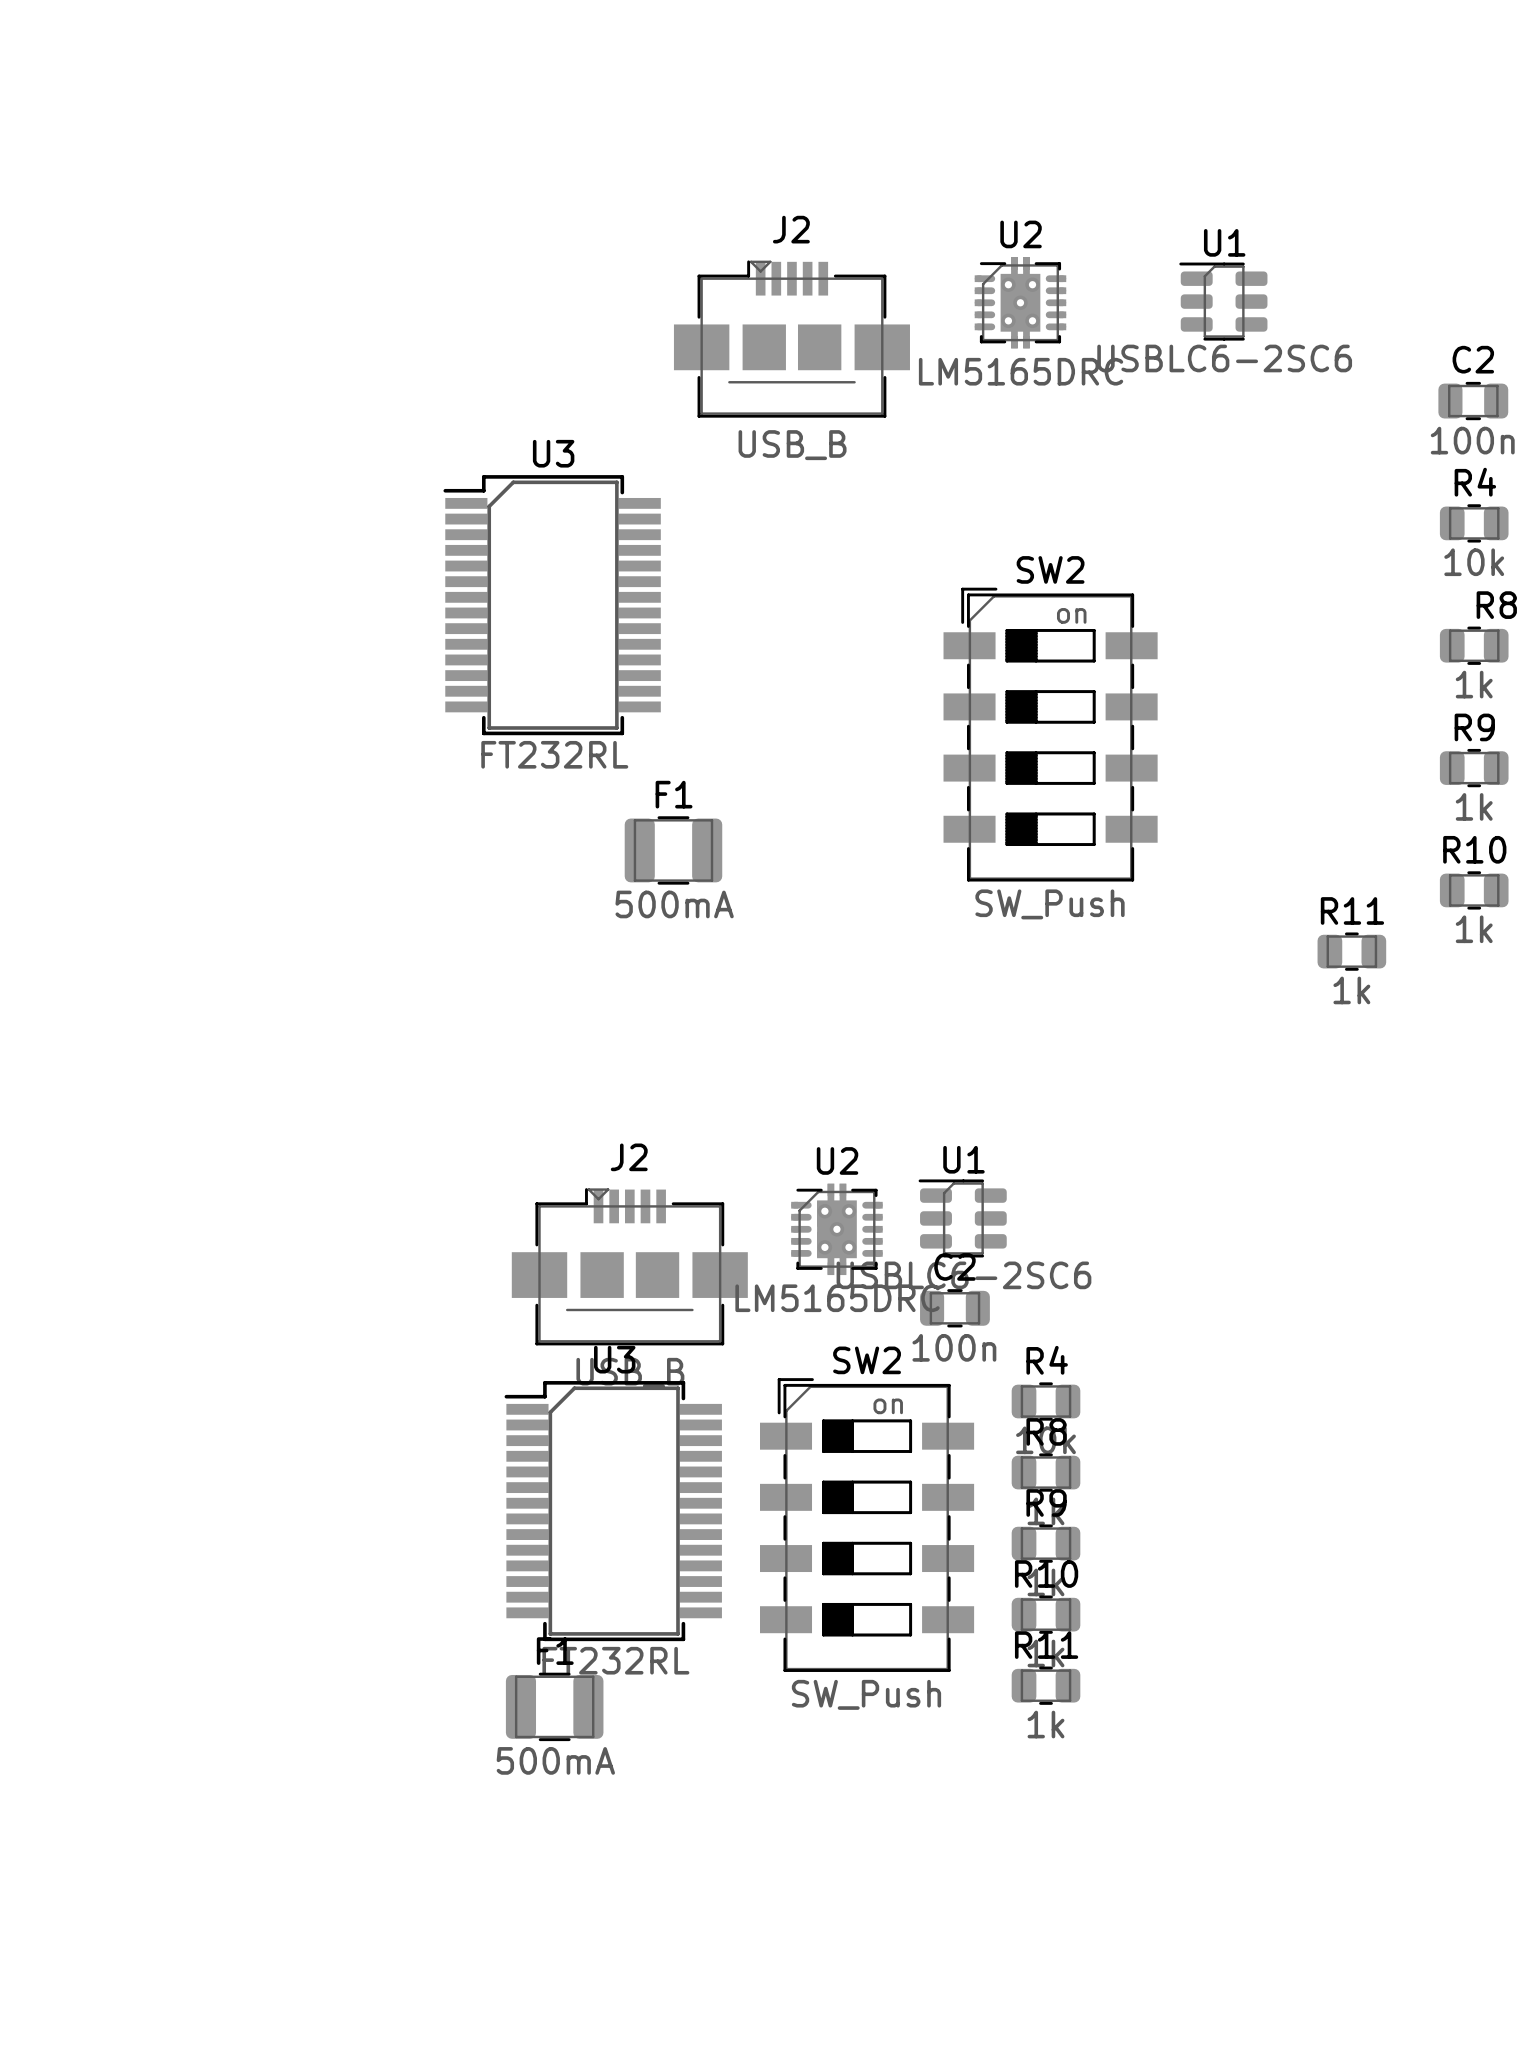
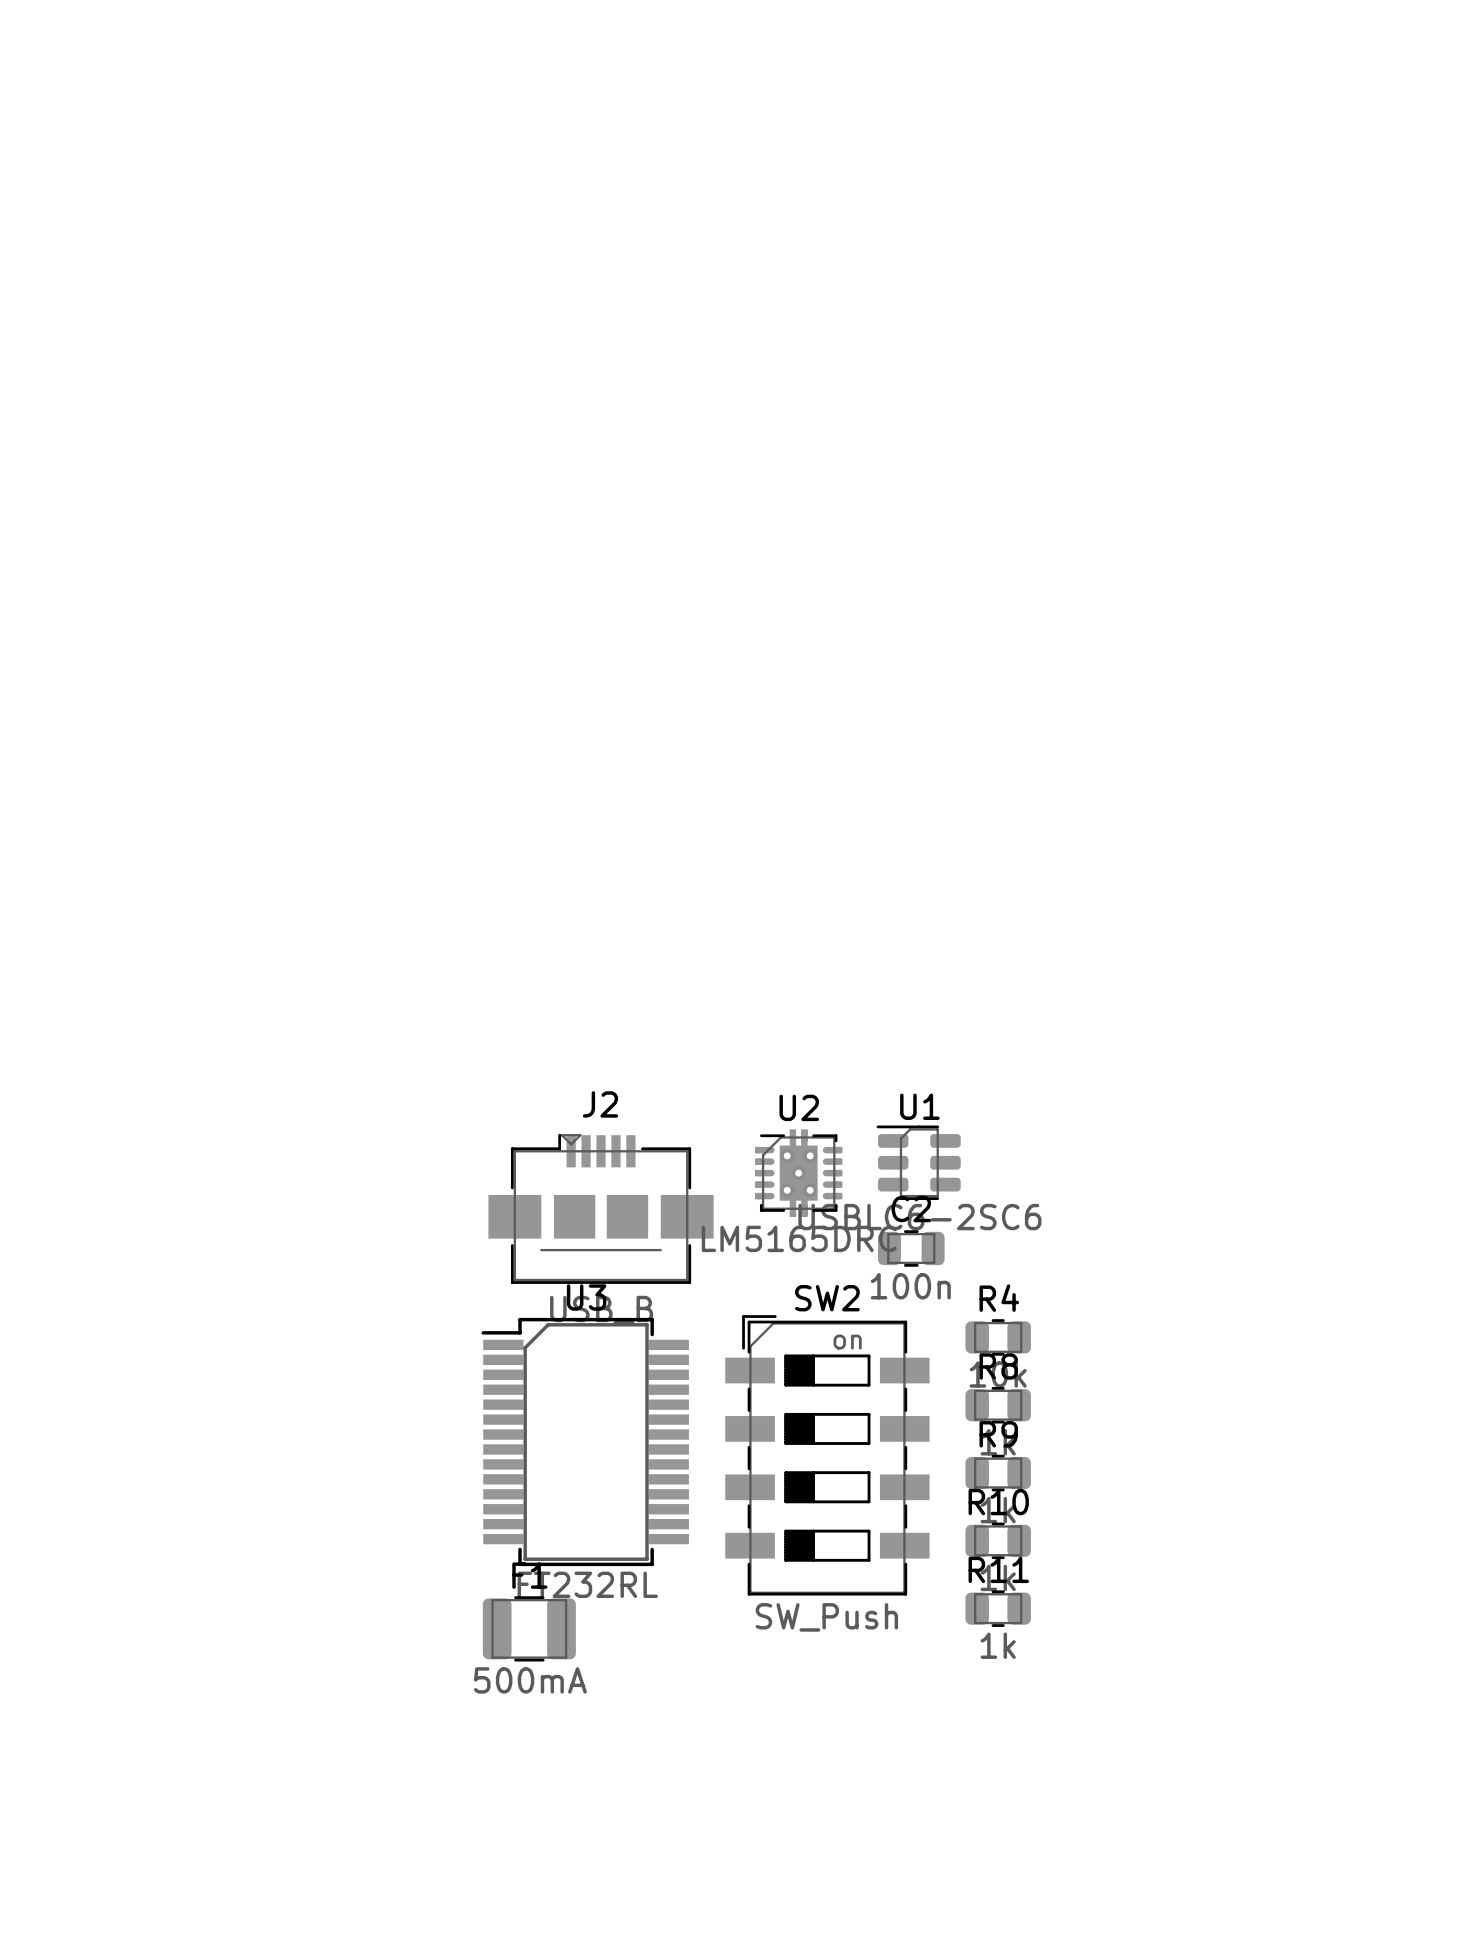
U1: USBLC6-2SC6 (1223, 301) -> none
U2: LM5165DRC (1020, 302) -> none
J2: USB_B (791, 339) -> none
C2: 100n (1473, 401) -> none
R4: 10k (1474, 523) -> none
U3: FT232RL (552, 605) -> none
R8: 1k (1474, 645) -> none
SW2: SW_Push (1050, 734) -> none
R9: 1k (1474, 768) -> none
F1: 500mA (673, 850) -> none
R10: 1k (1474, 890) -> none
R11: 1k (1351, 951) -> none

